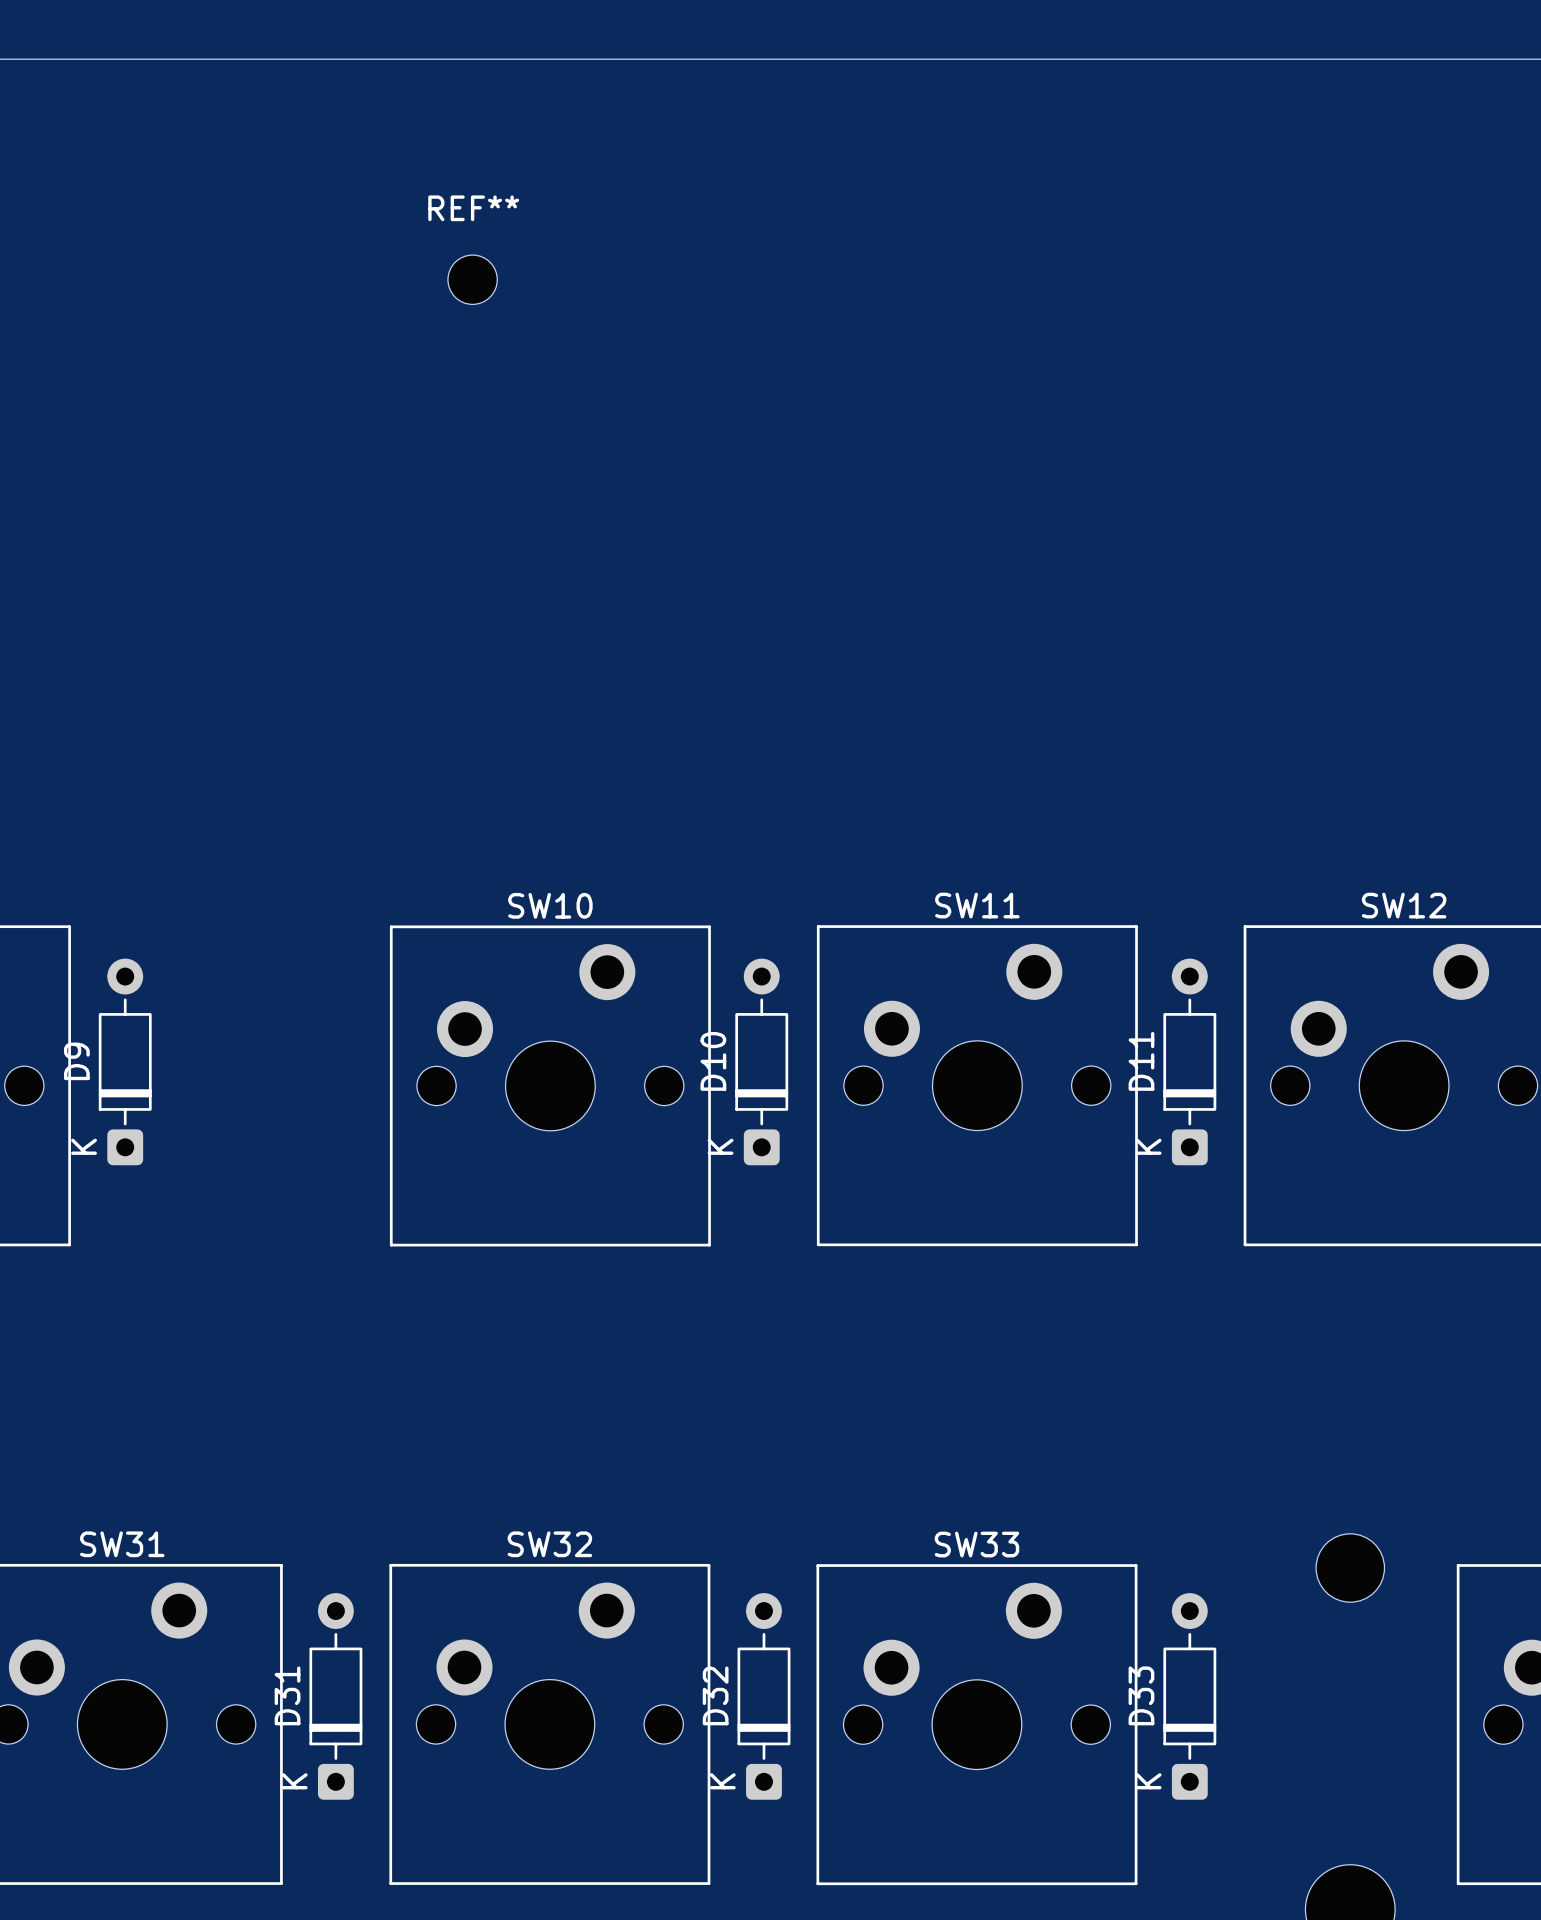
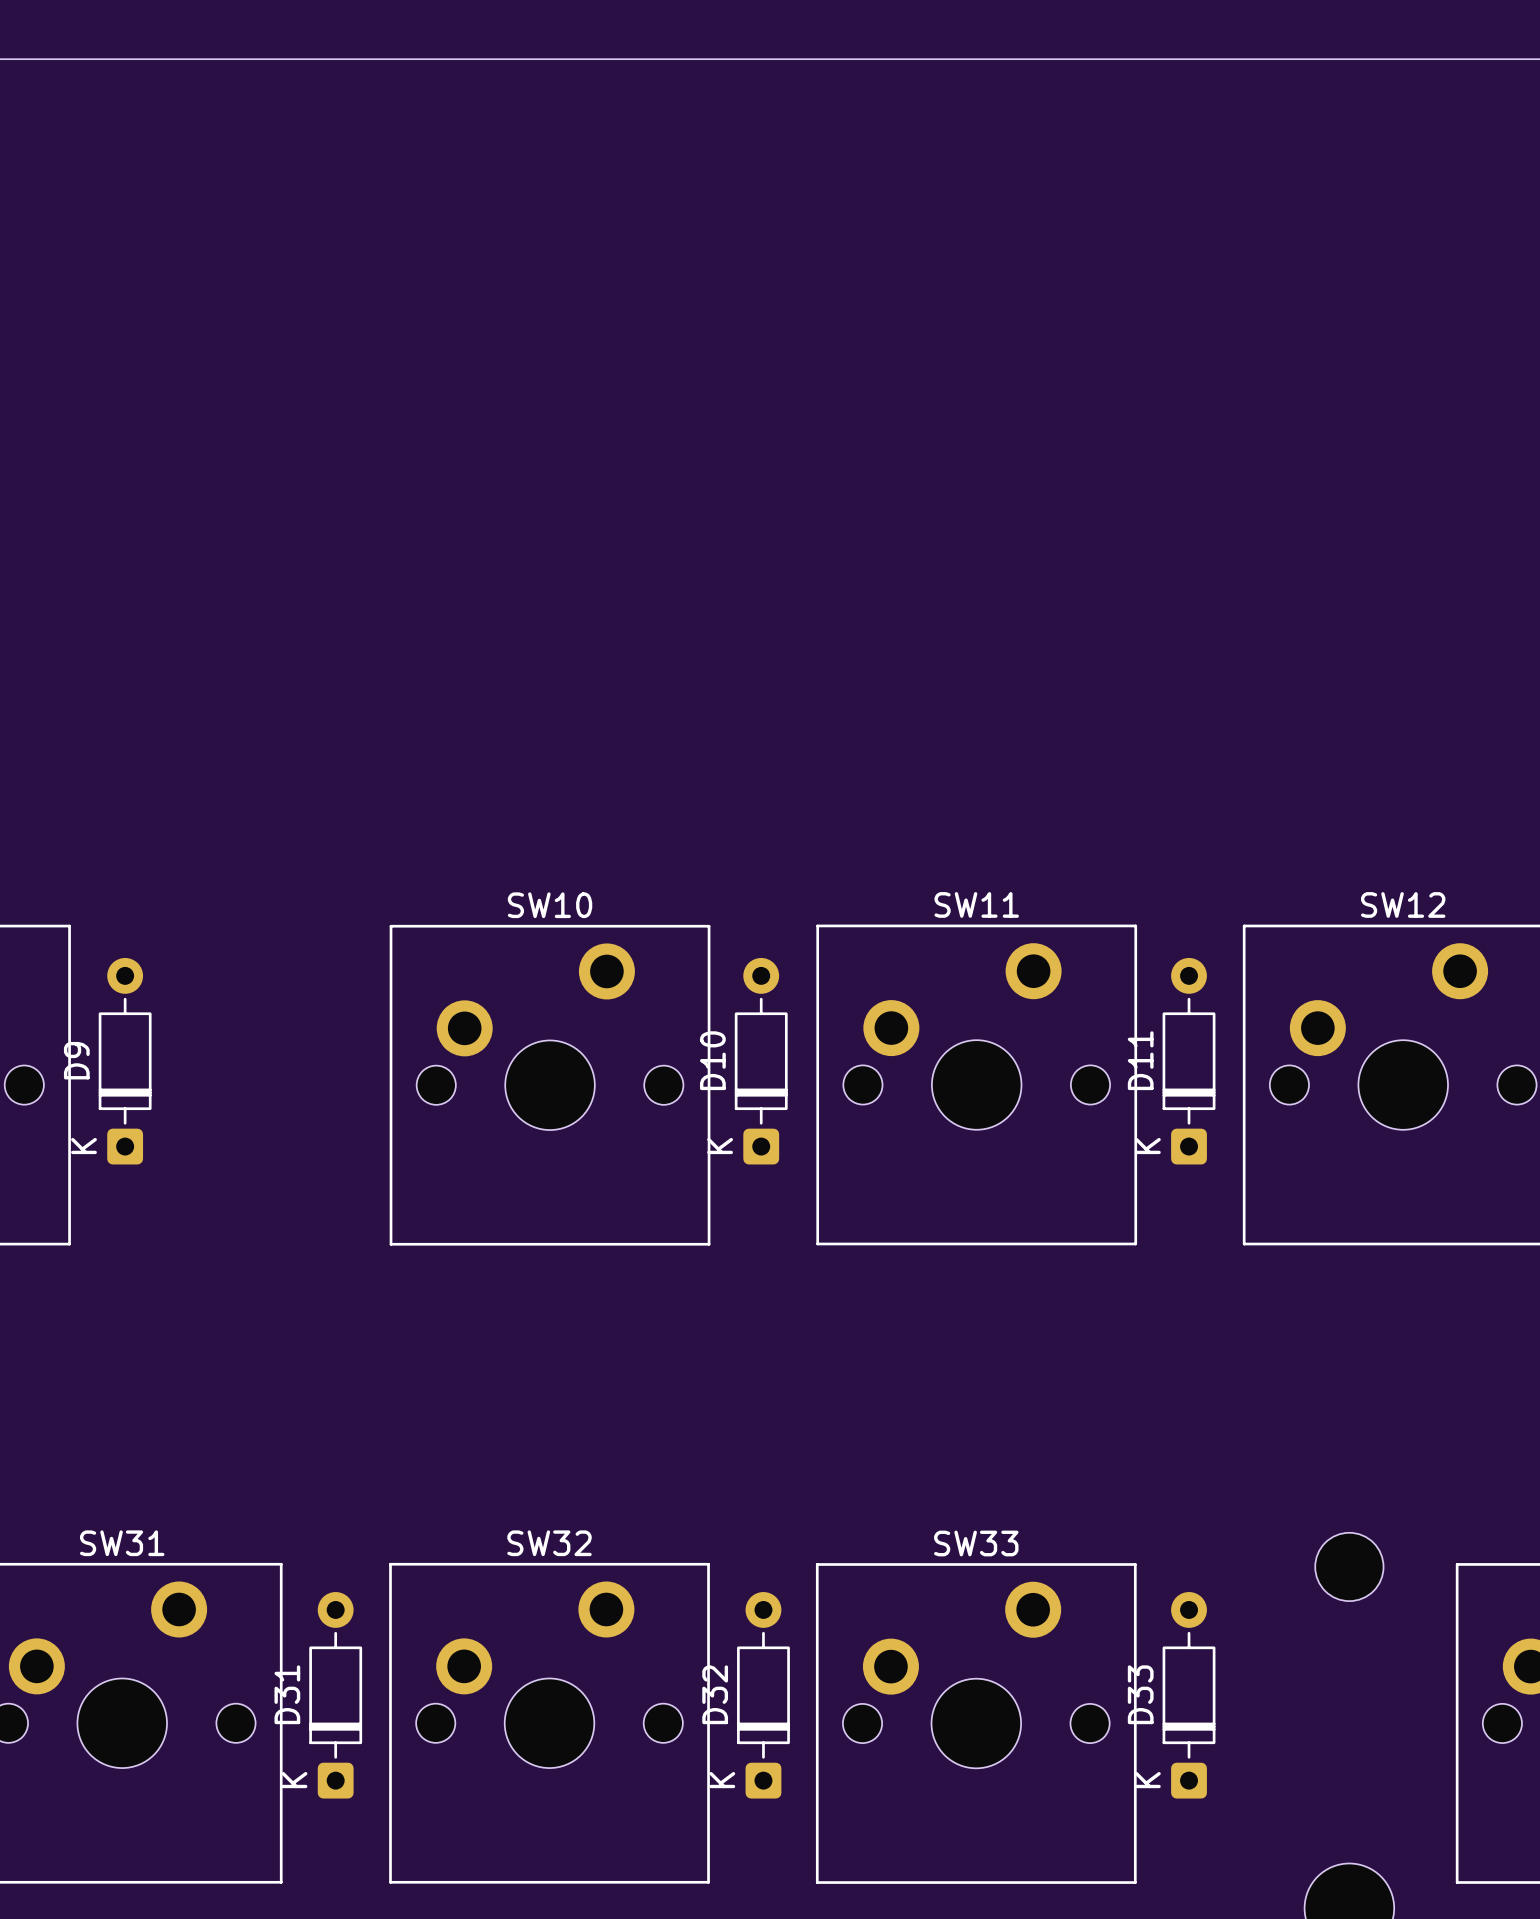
REF**: (472, 279) -> none

